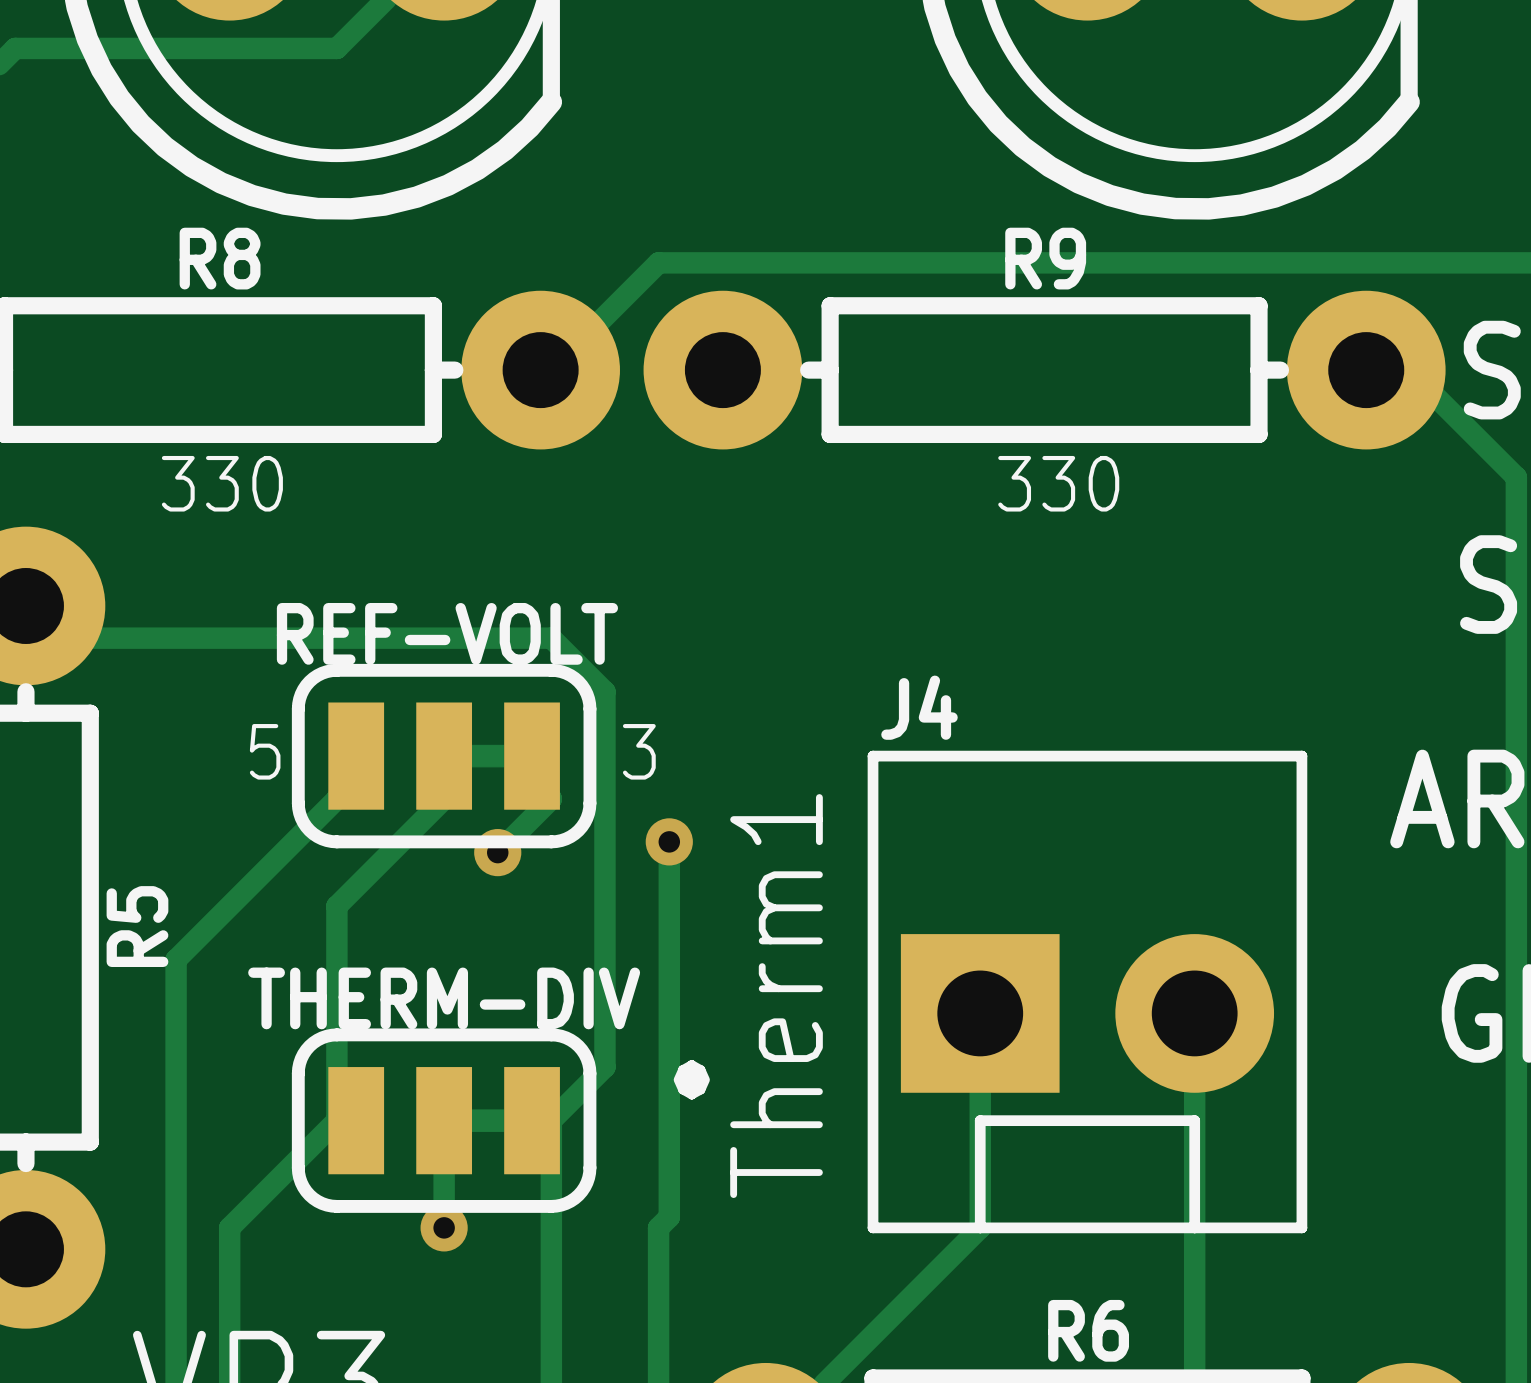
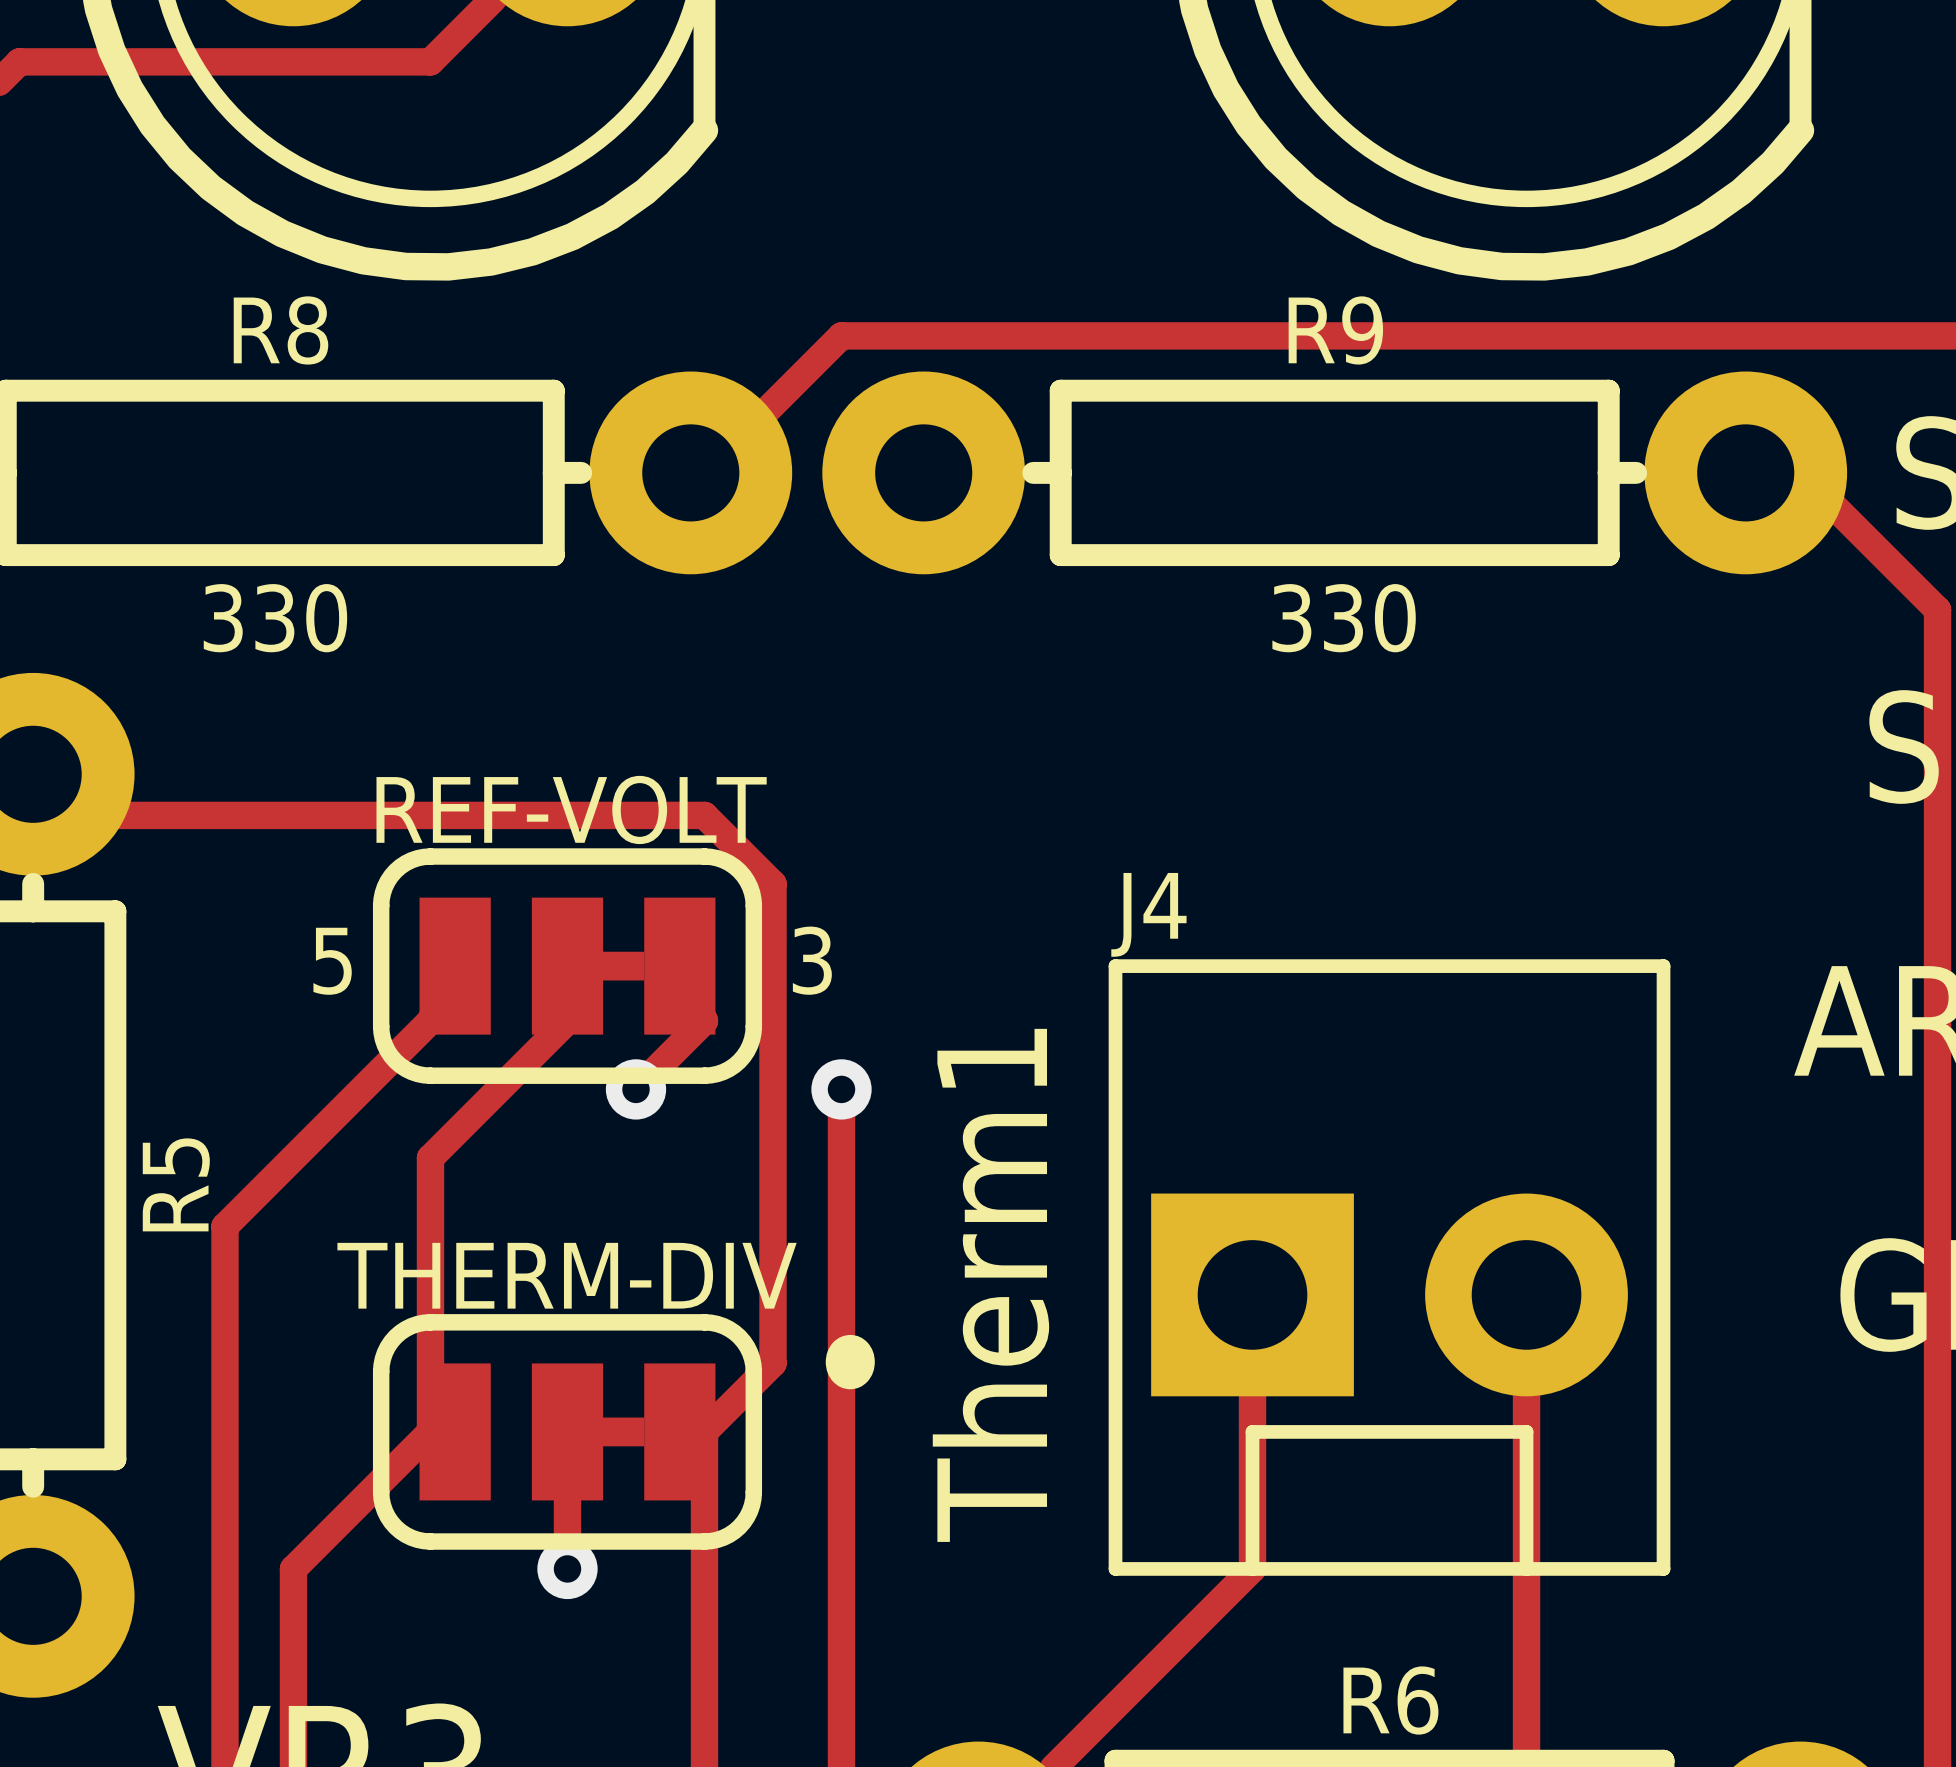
track: (669, 841) (669, 1217) (658, 1227) -> (841, 1089) (841, 1568)
via position: (669, 841) -> (841, 1089)

